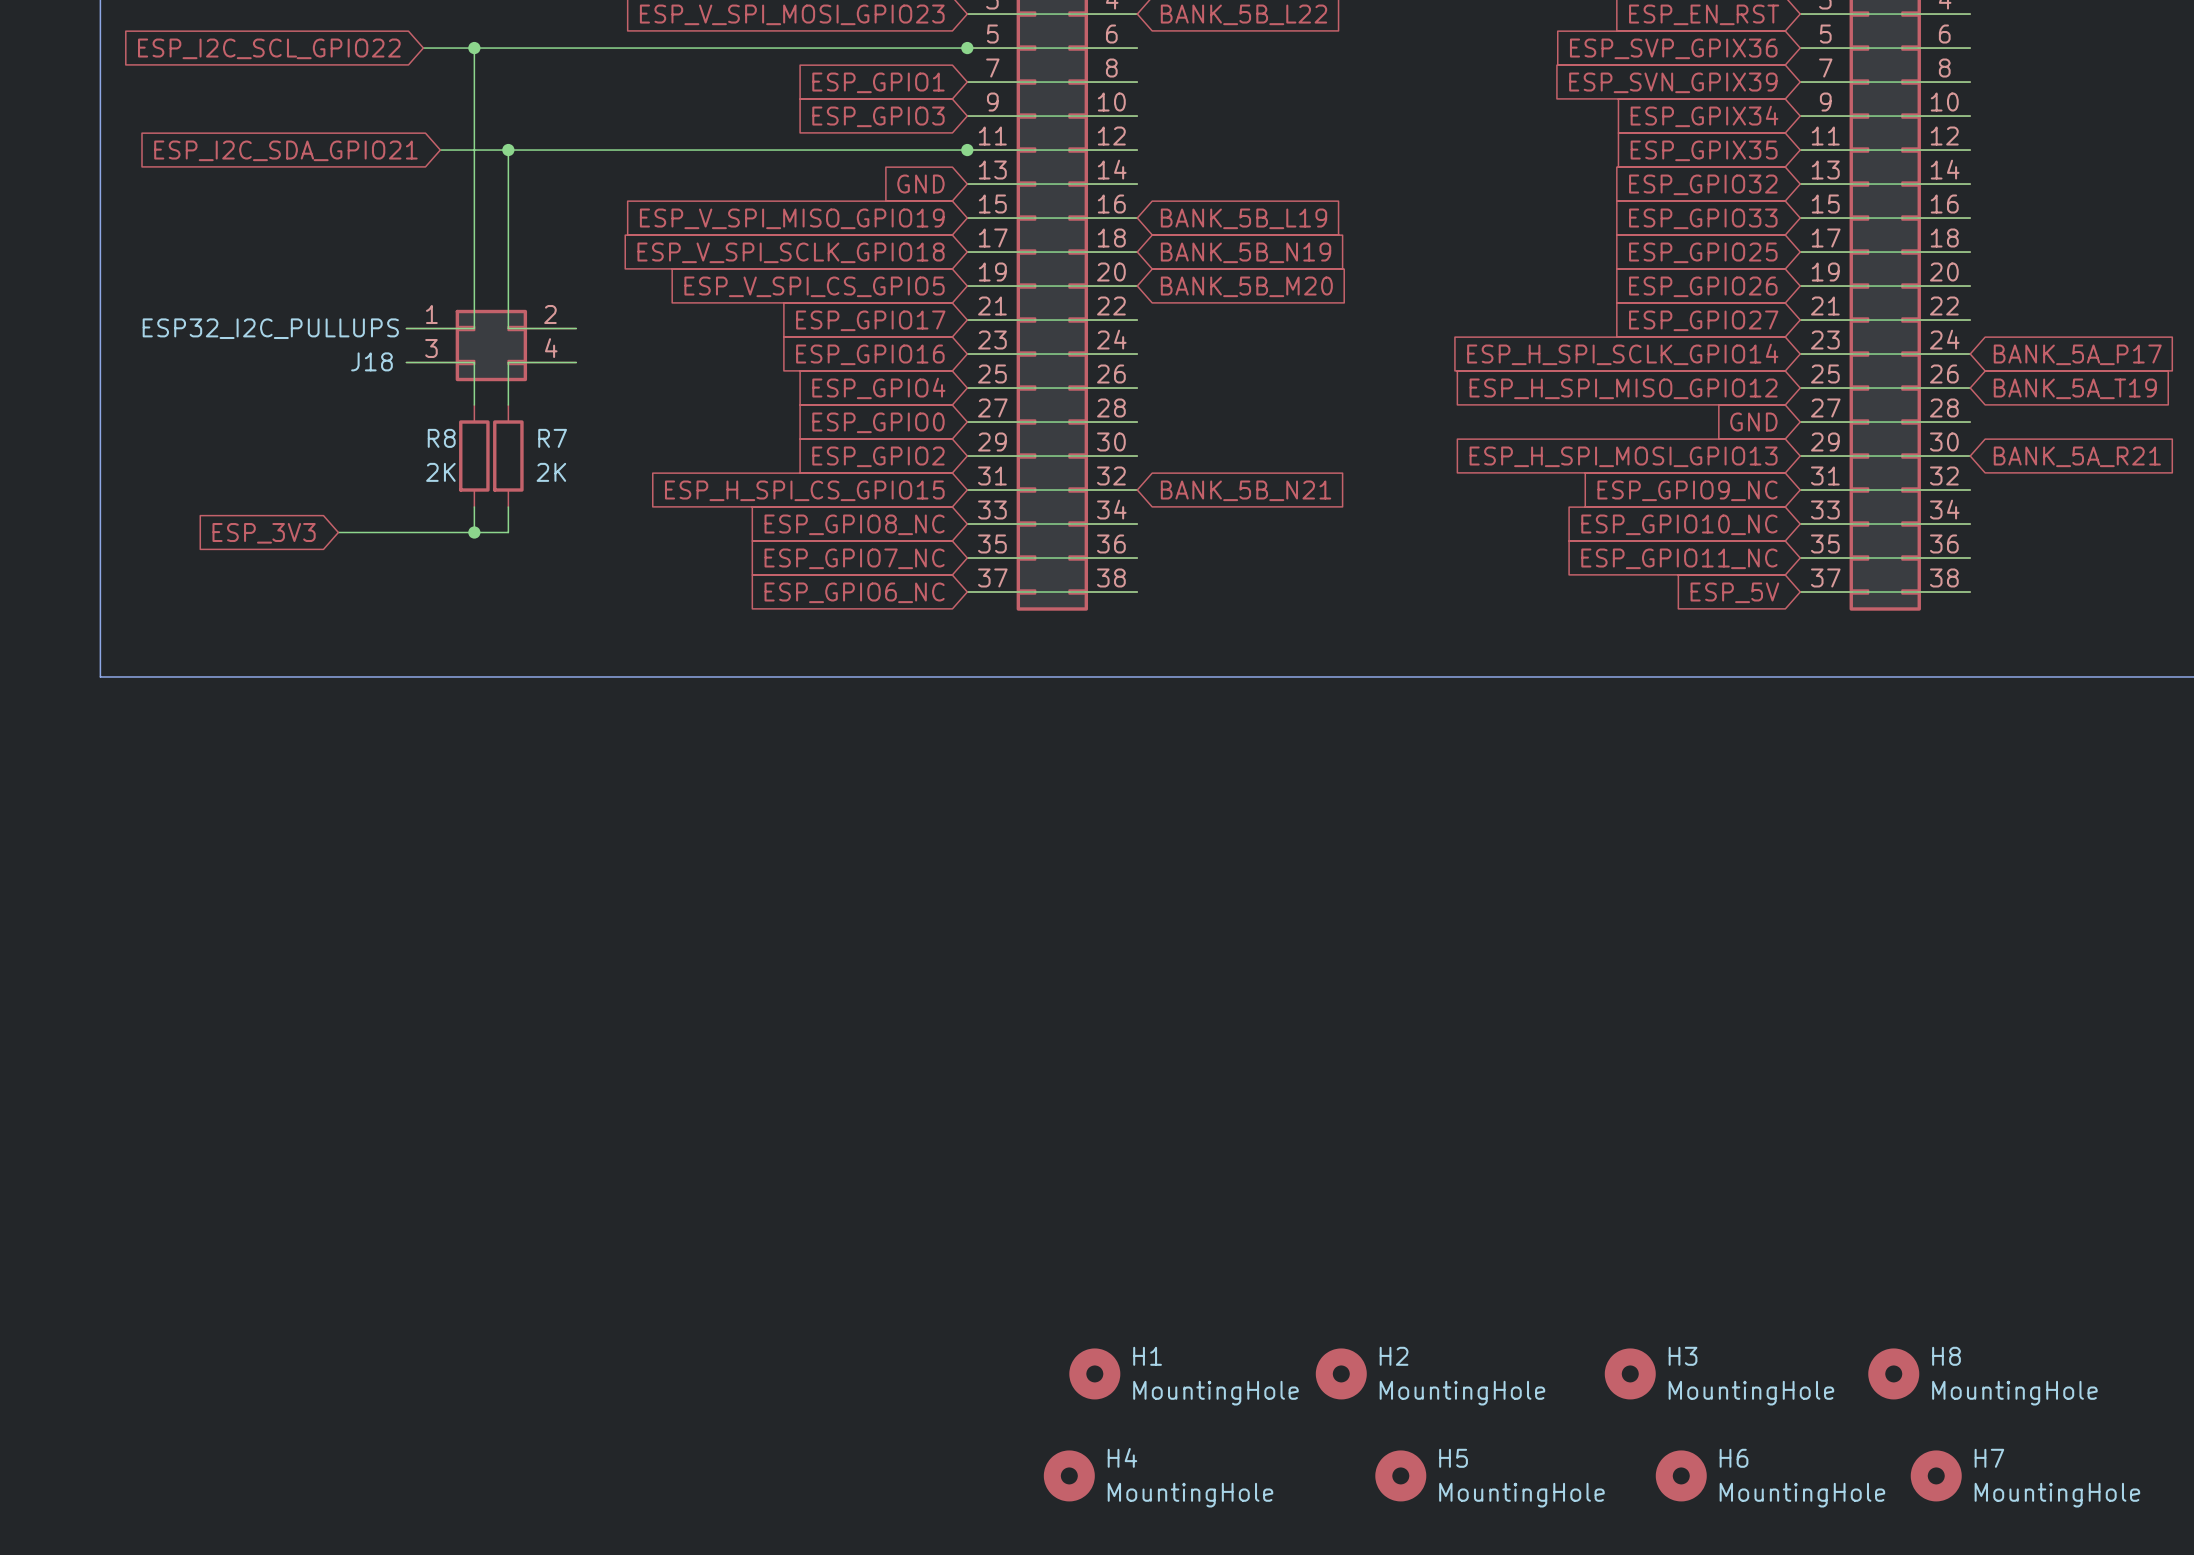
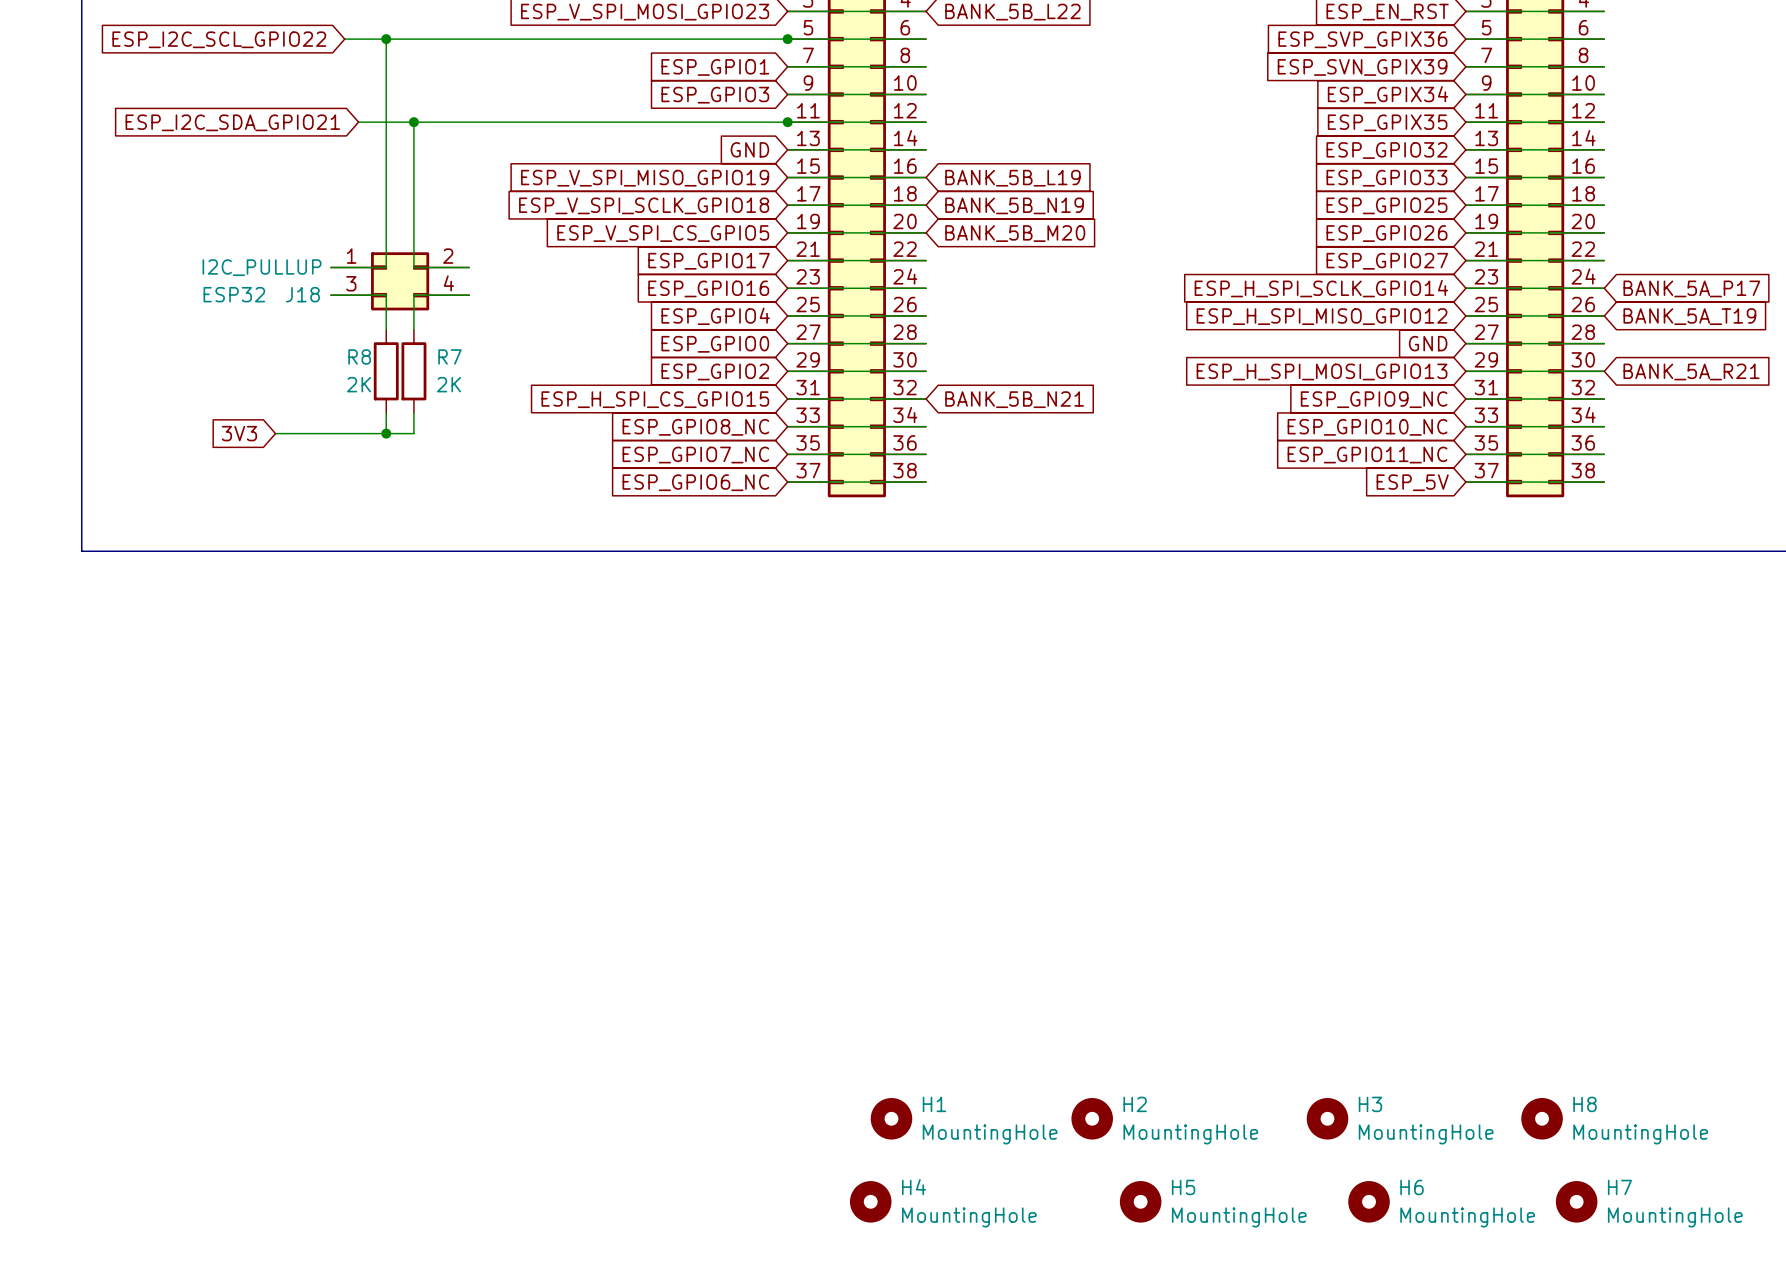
J18 value: ESP32_I2C_PULLUPS (270, 328) -> I2C_PULLUP (262, 267)
J18 text: none -> ESP32 (234, 294)
global label: ESP_3V3 (264, 533) -> 3V3 (239, 433)

